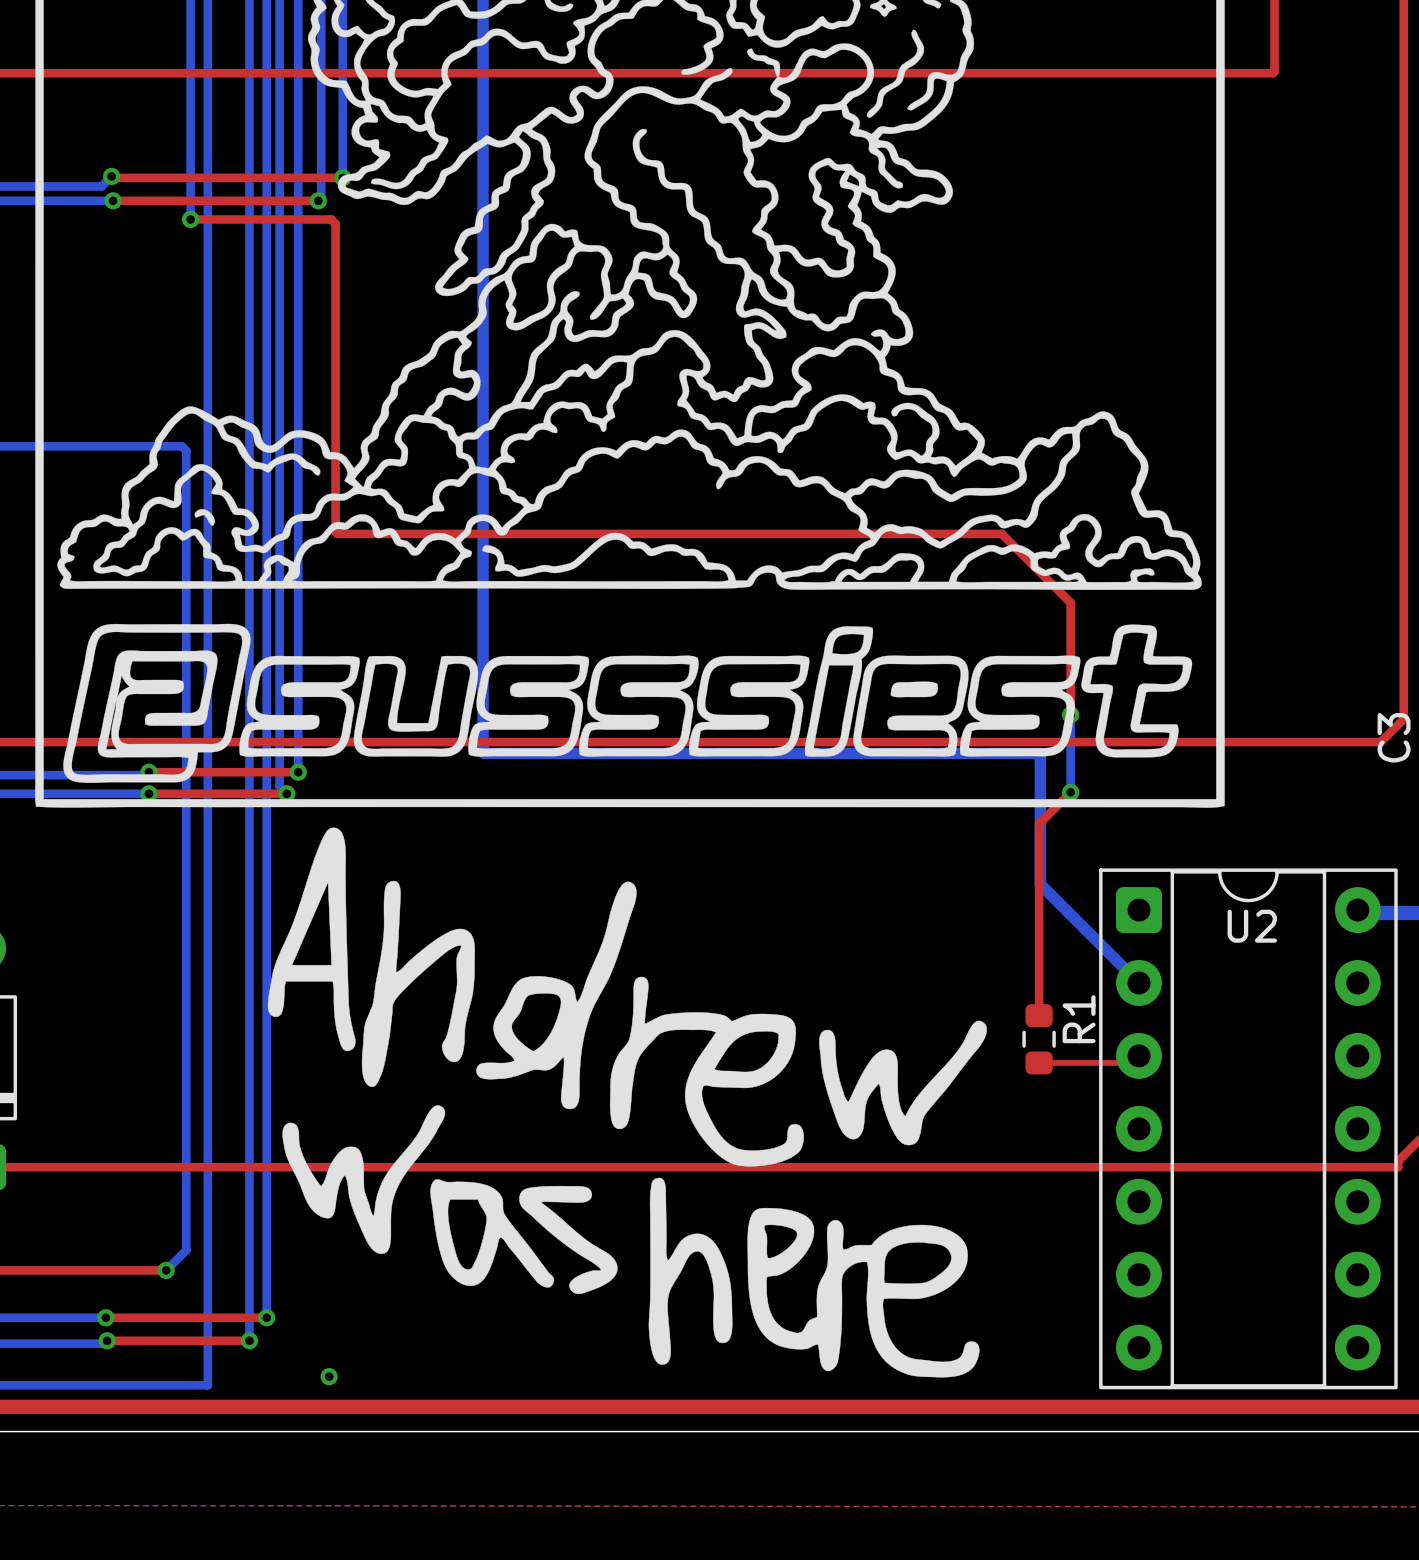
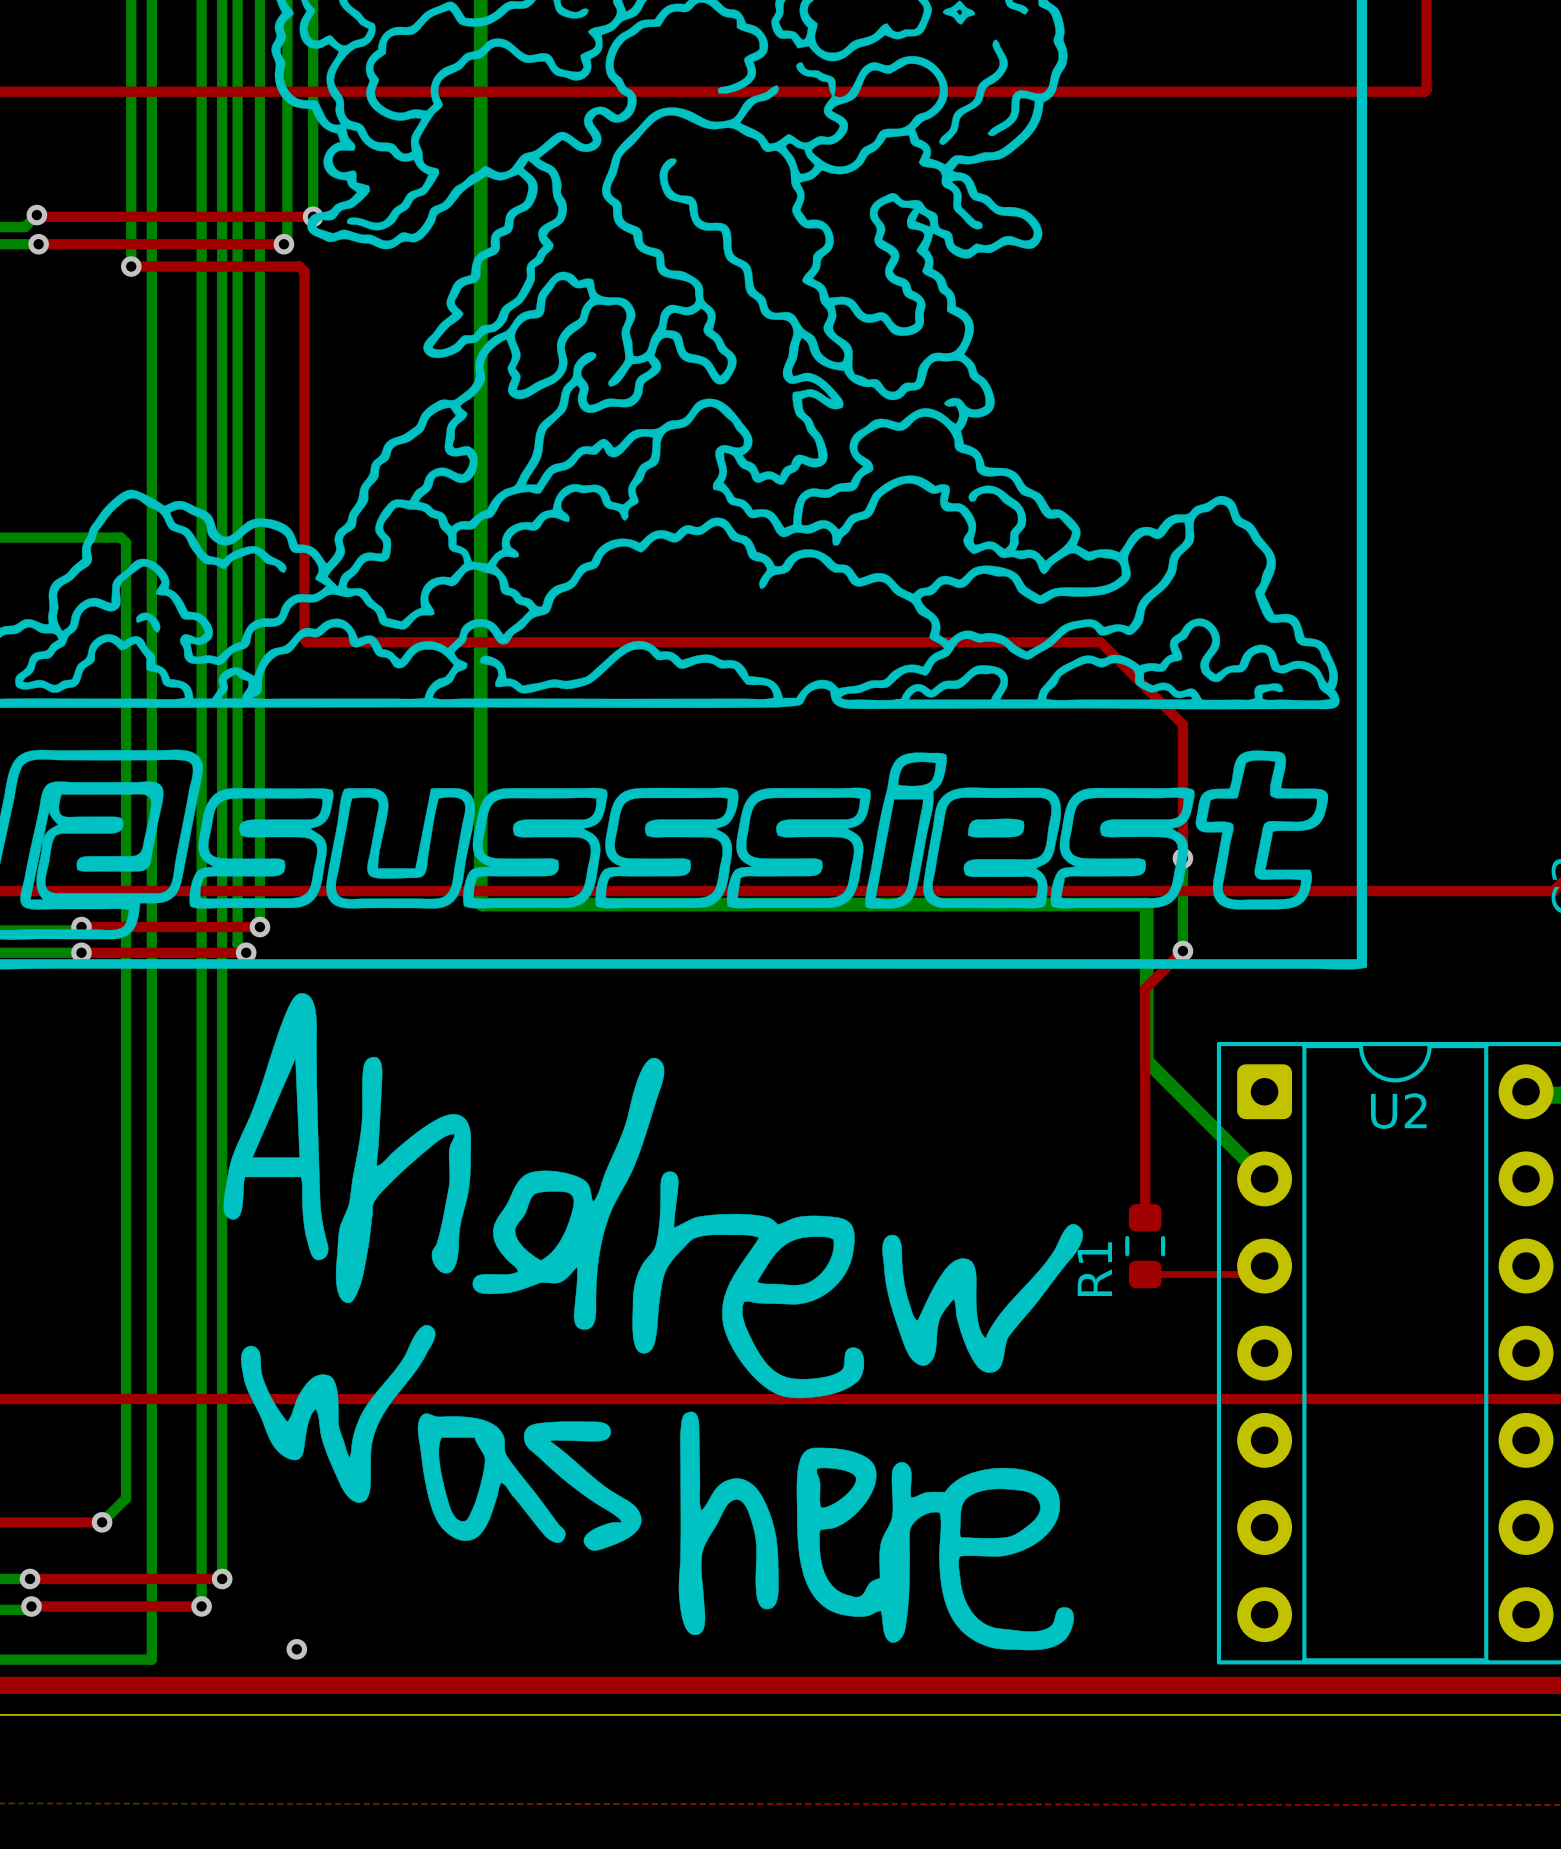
R1 name position: R1 (1079, 1019) -> R1 (1094, 1269)

